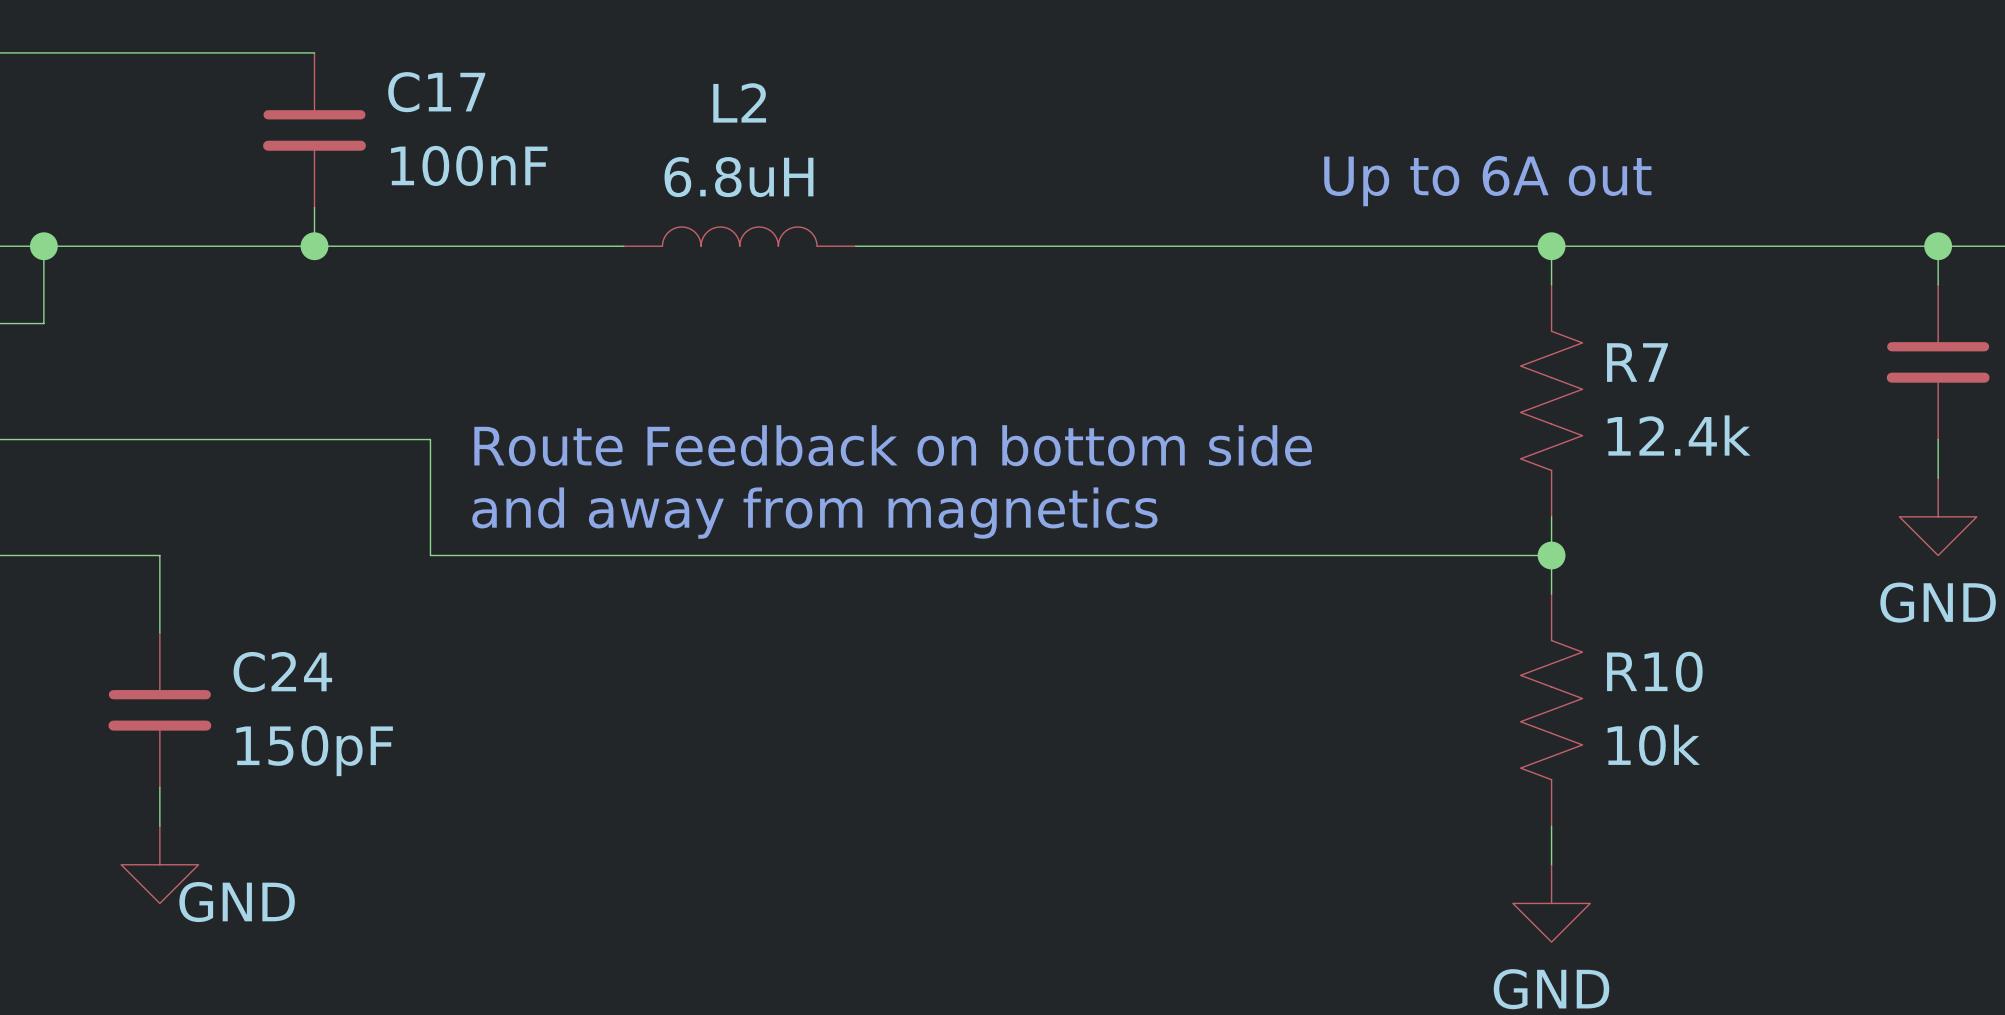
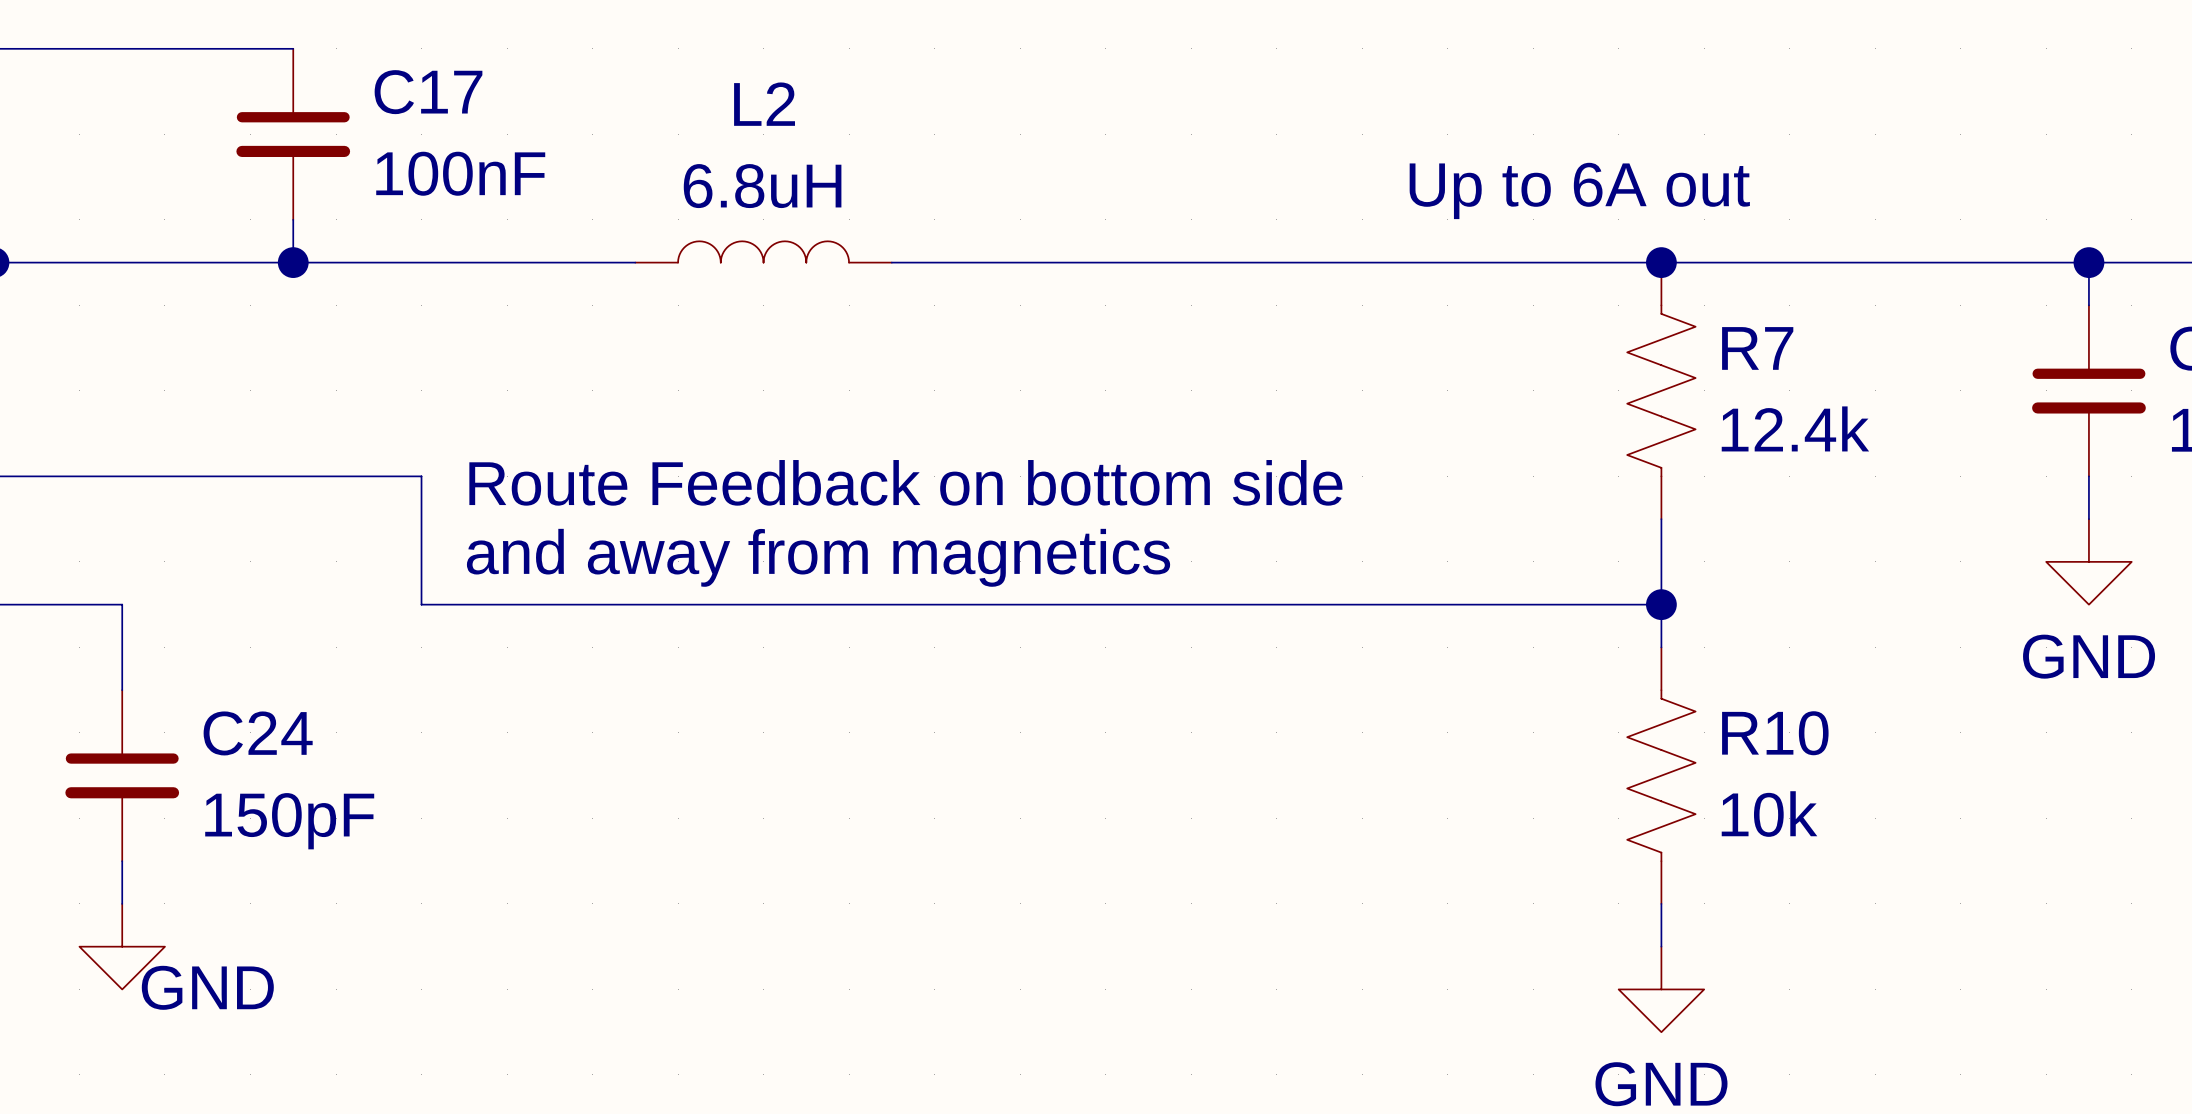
R7 position: (1551, 400) -> (1661, 390)

